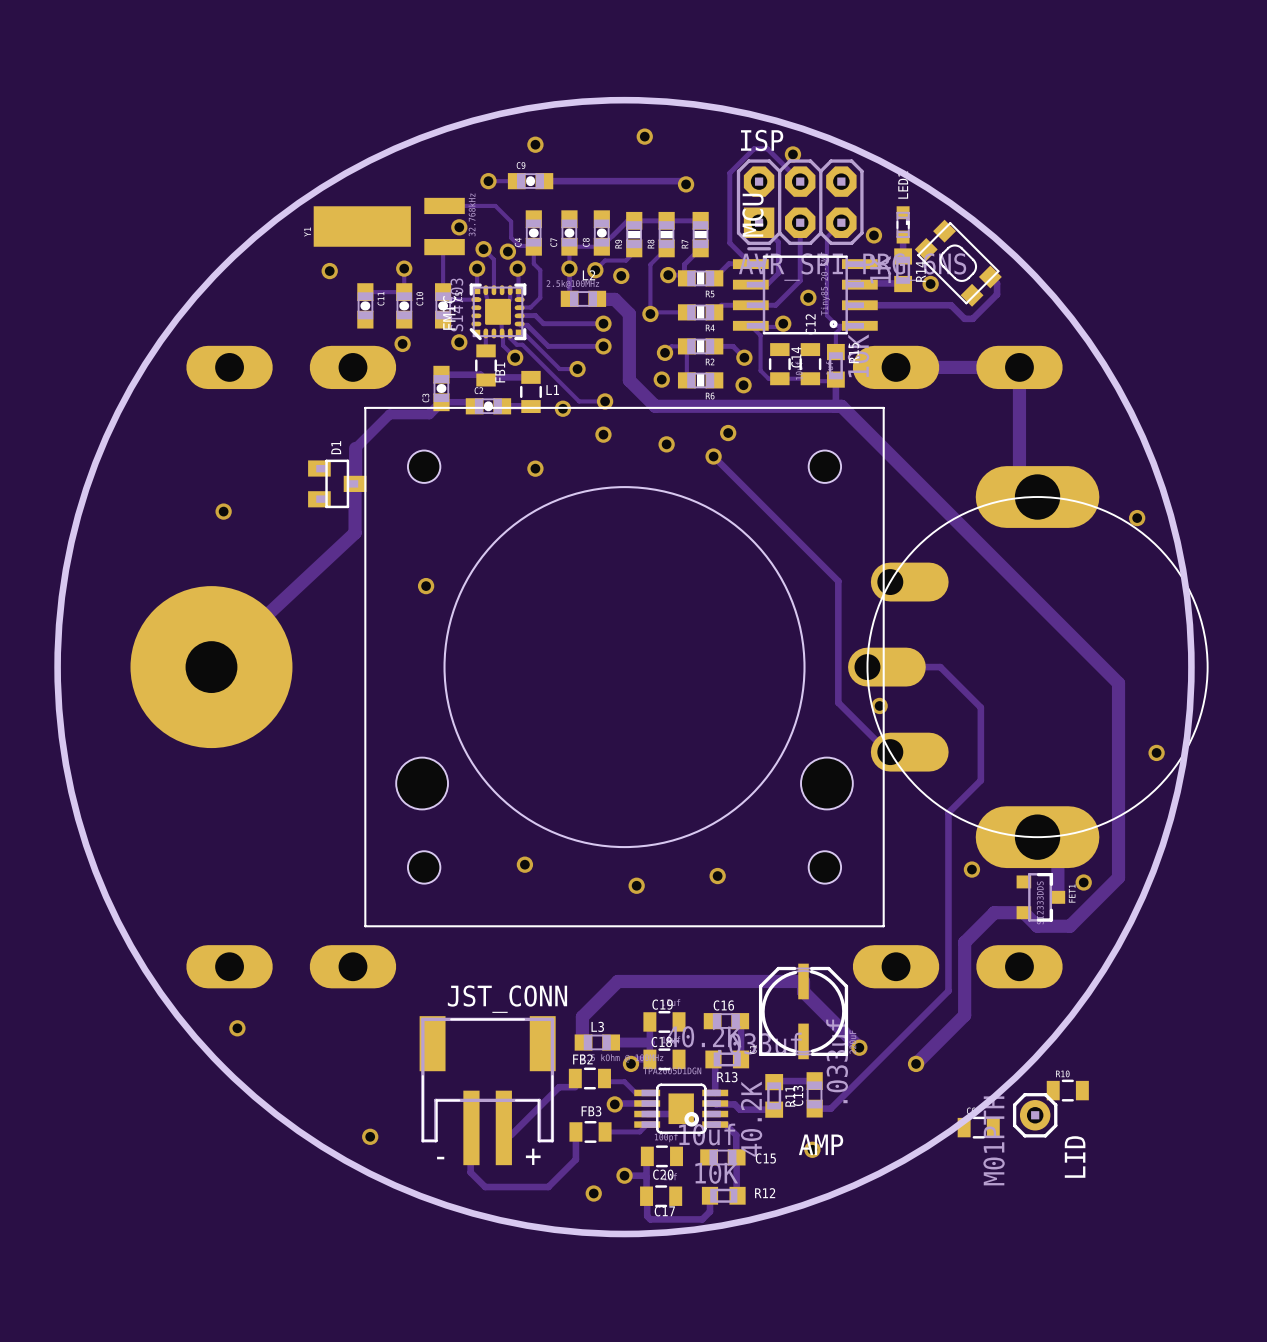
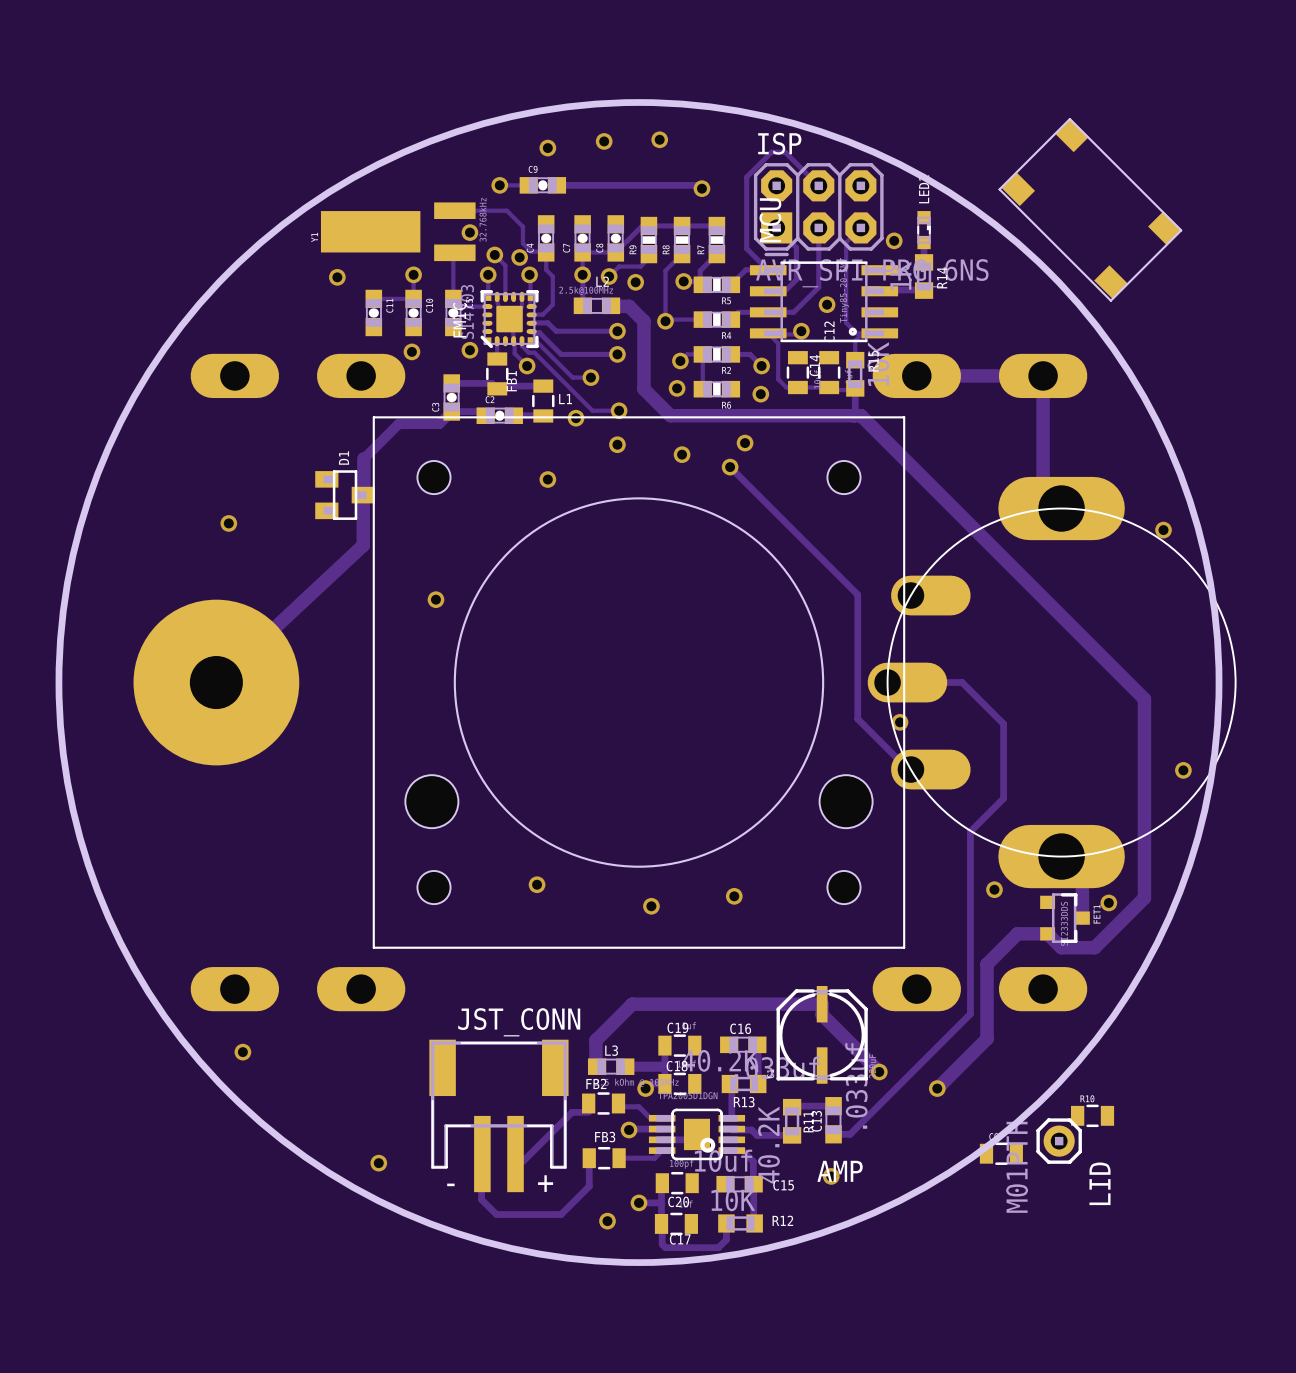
via: none -> (604, 141)
via: (792, 154) -> none
part: none -> (1090, 209)
part: (958, 263) -> none
track: (990, 276) (997, 283) (997, 294) (972, 318) (964, 318) (951, 305) (859, 305) -> none
via: (930, 284) -> none

